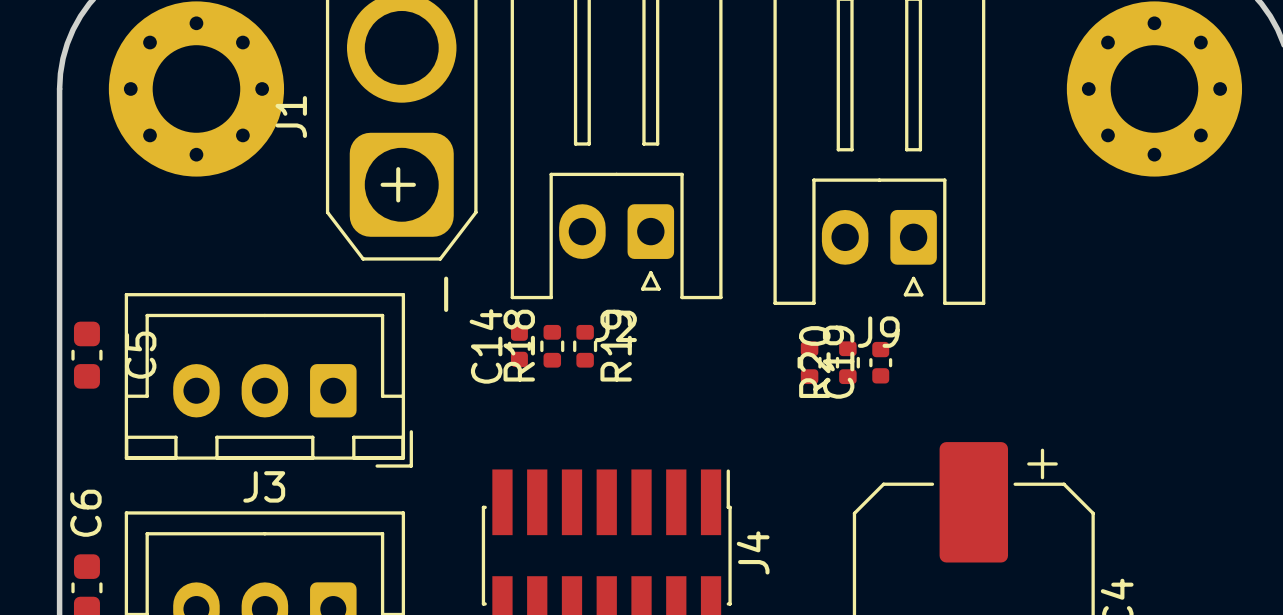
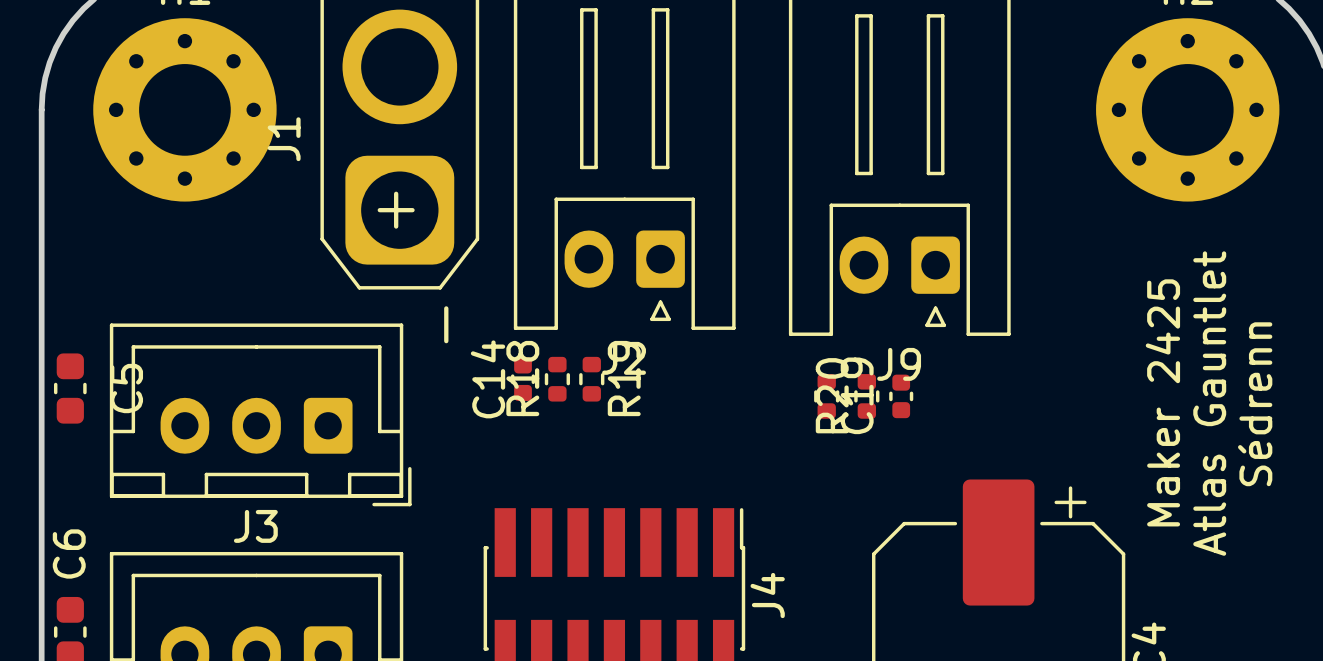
text: none -> Maker 2425 (1162, 402)
text: none -> Atlas Gauntlet (1209, 403)
text: none -> Sédrenn (1255, 404)

